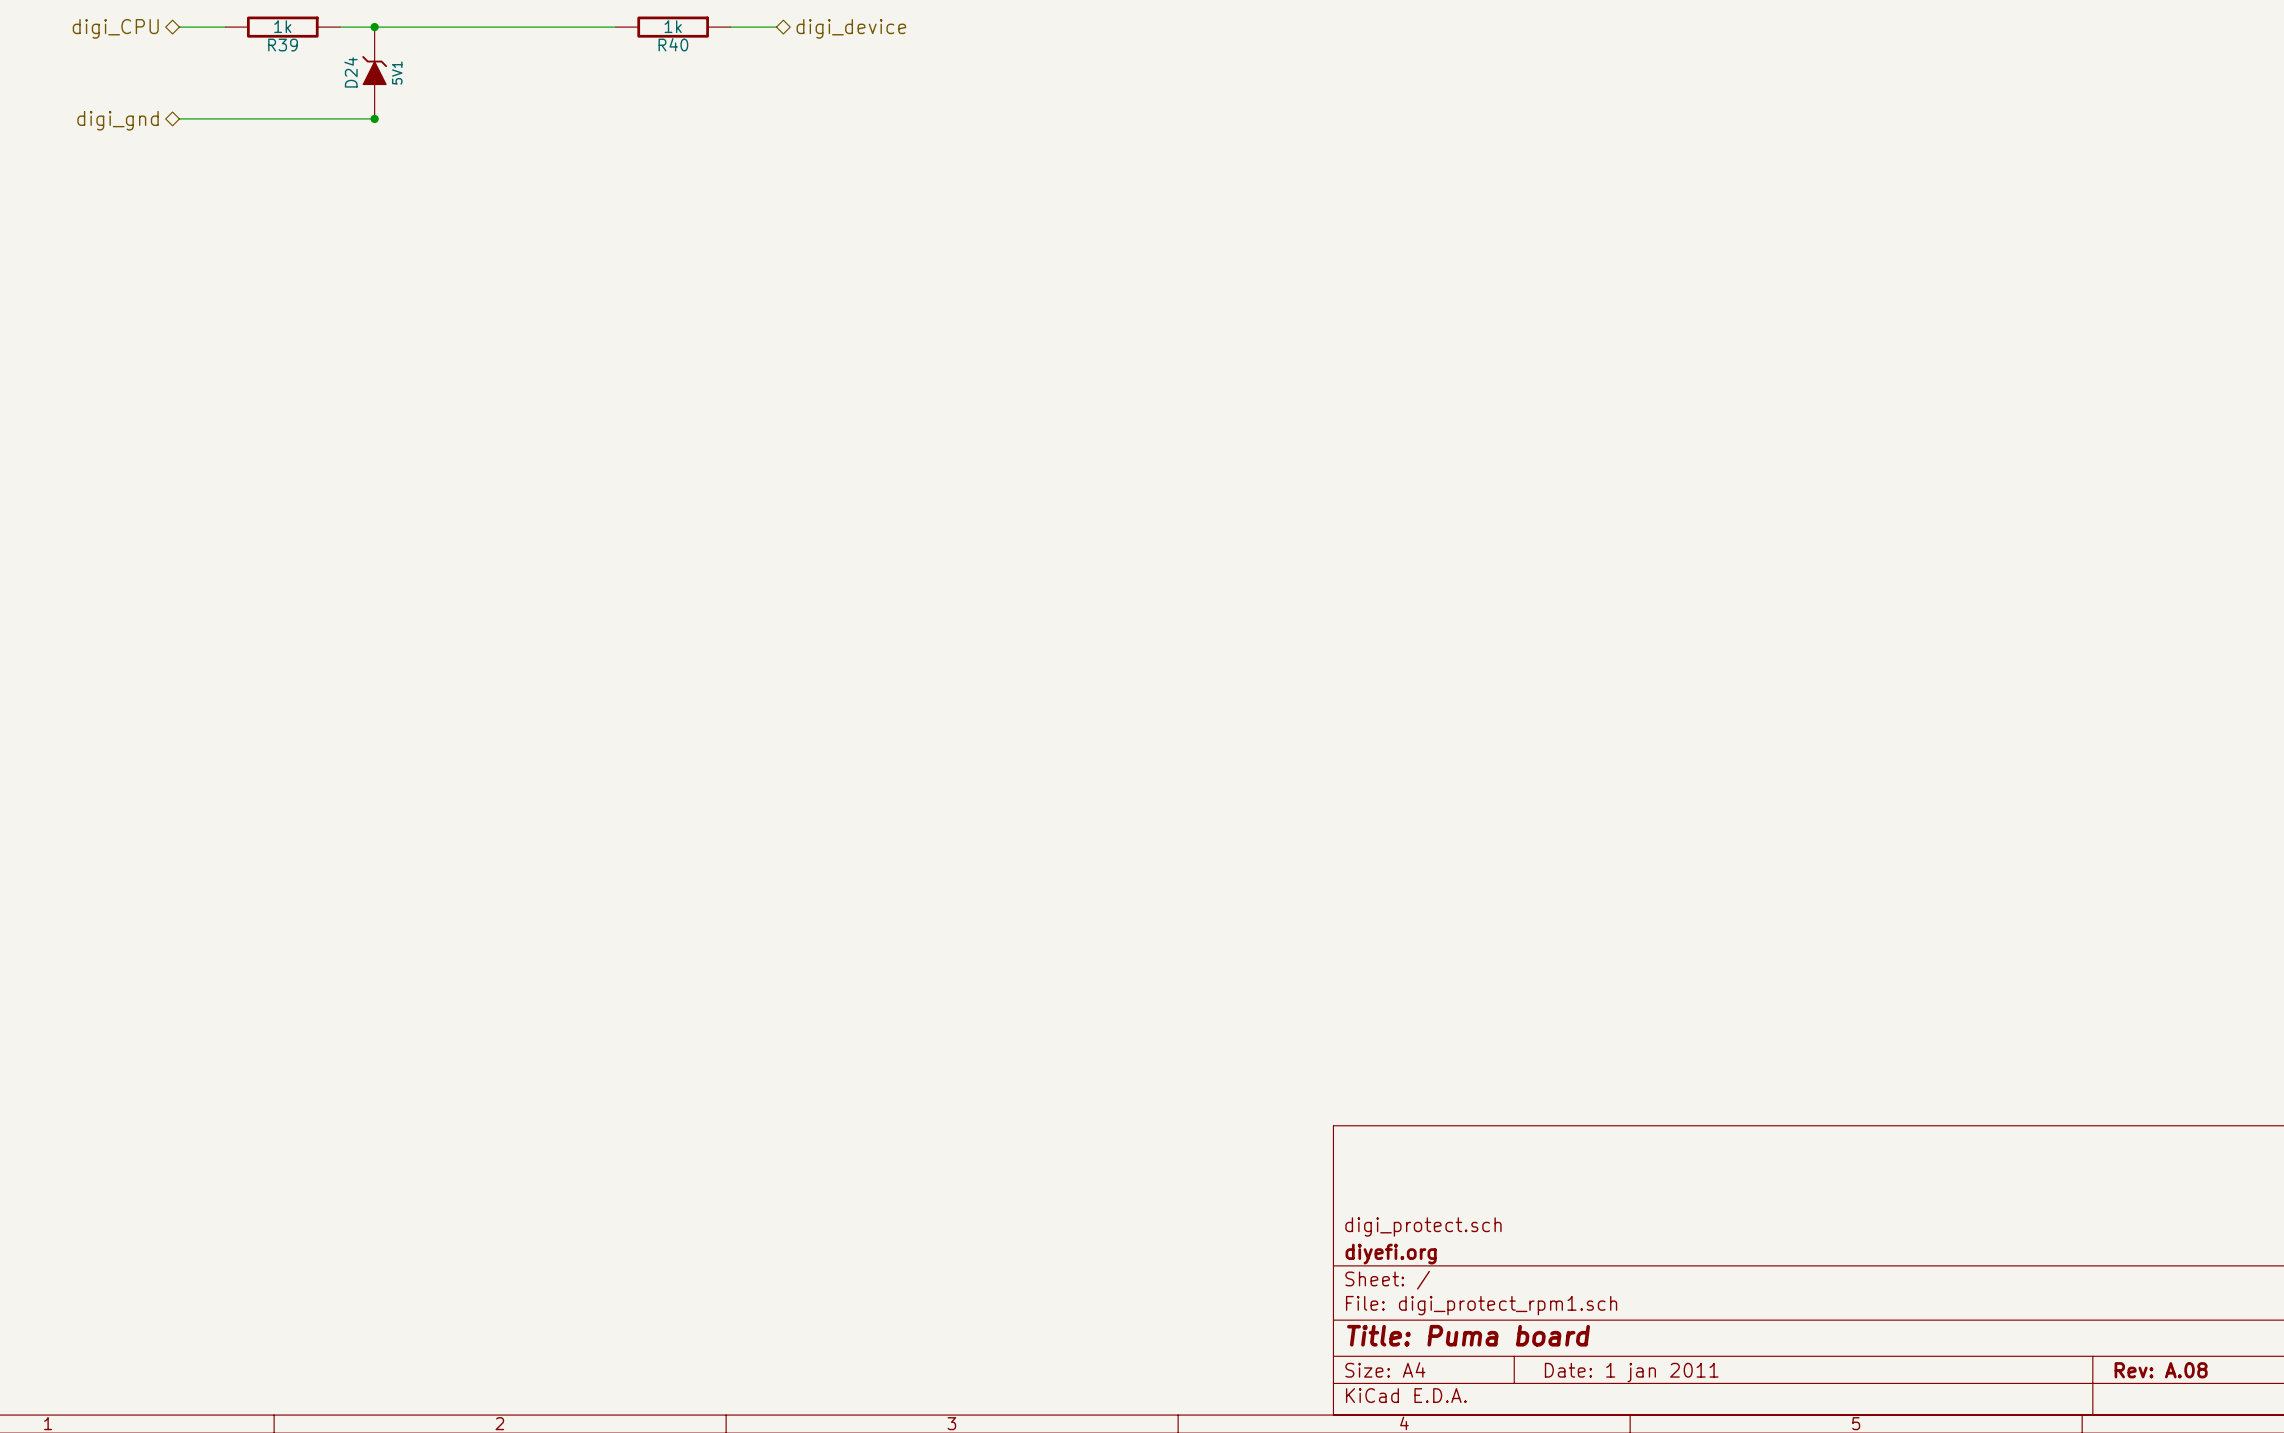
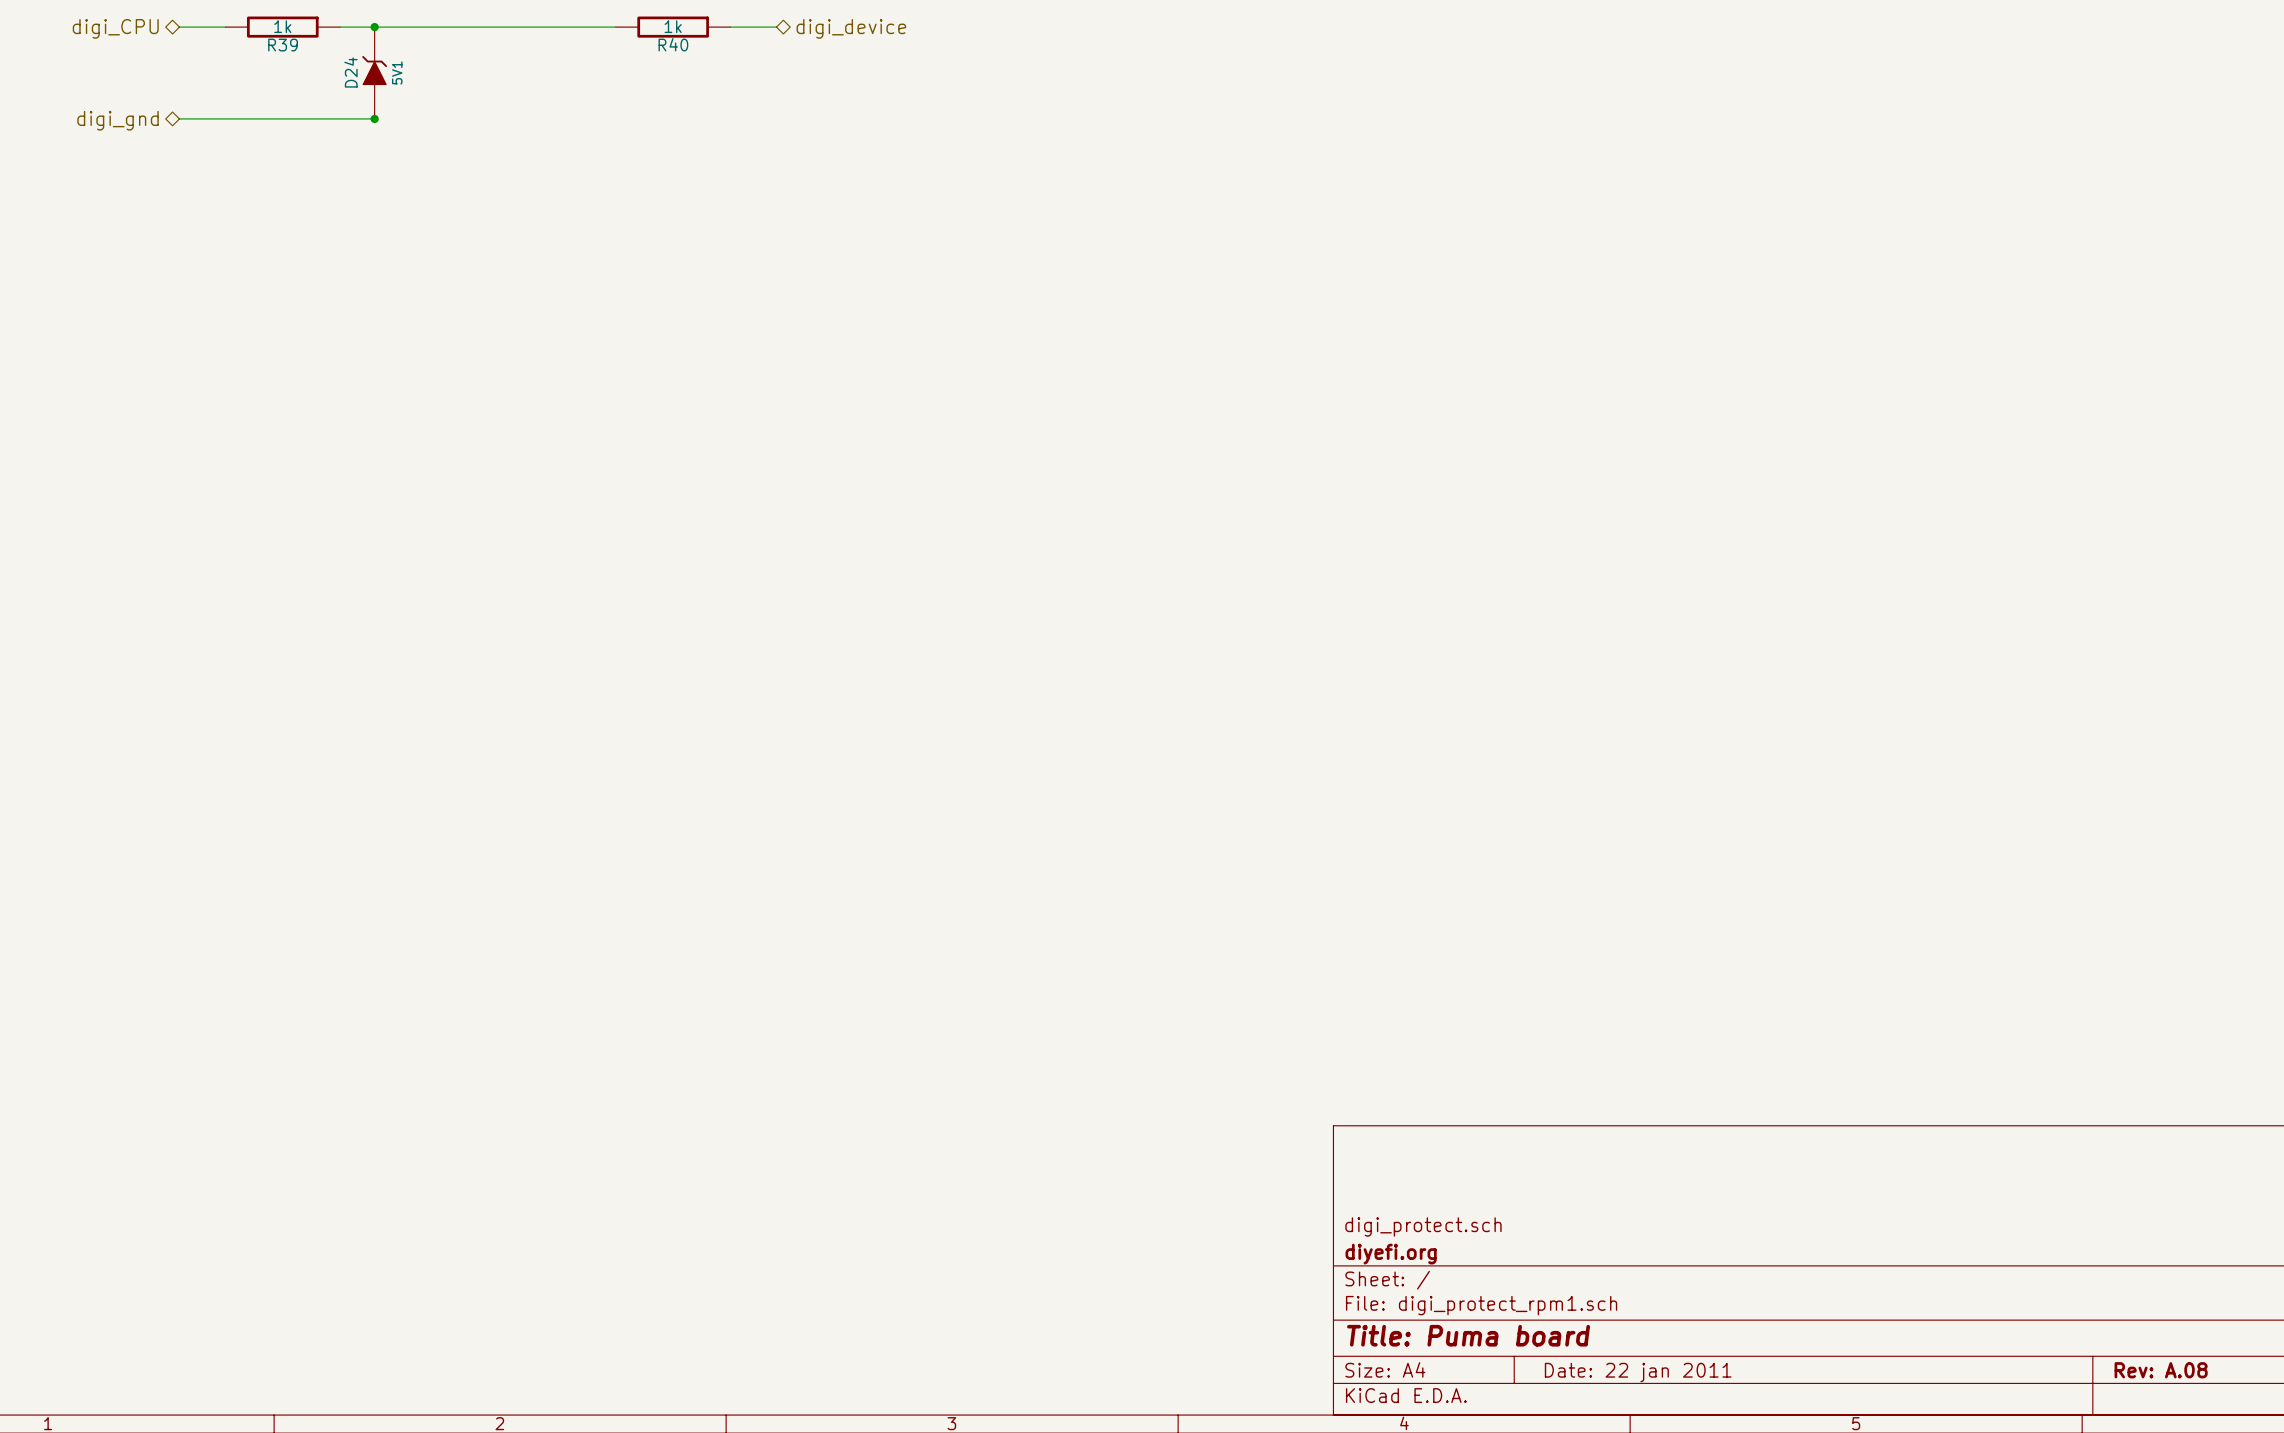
title block: Date: 1 jan 2011 (1631, 1372) -> Date: 22 jan 2011 (1638, 1372)

